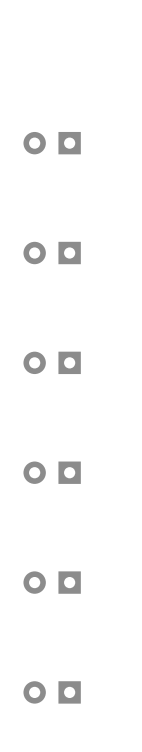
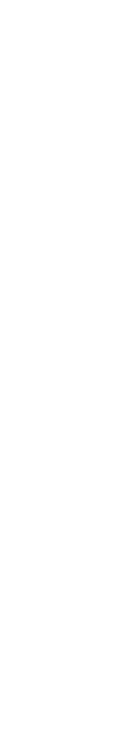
part: (52, 143) -> none
part: (52, 253) -> none
part: (52, 362) -> none
part: (52, 472) -> none
part: (52, 582) -> none
part: (52, 692) -> none

